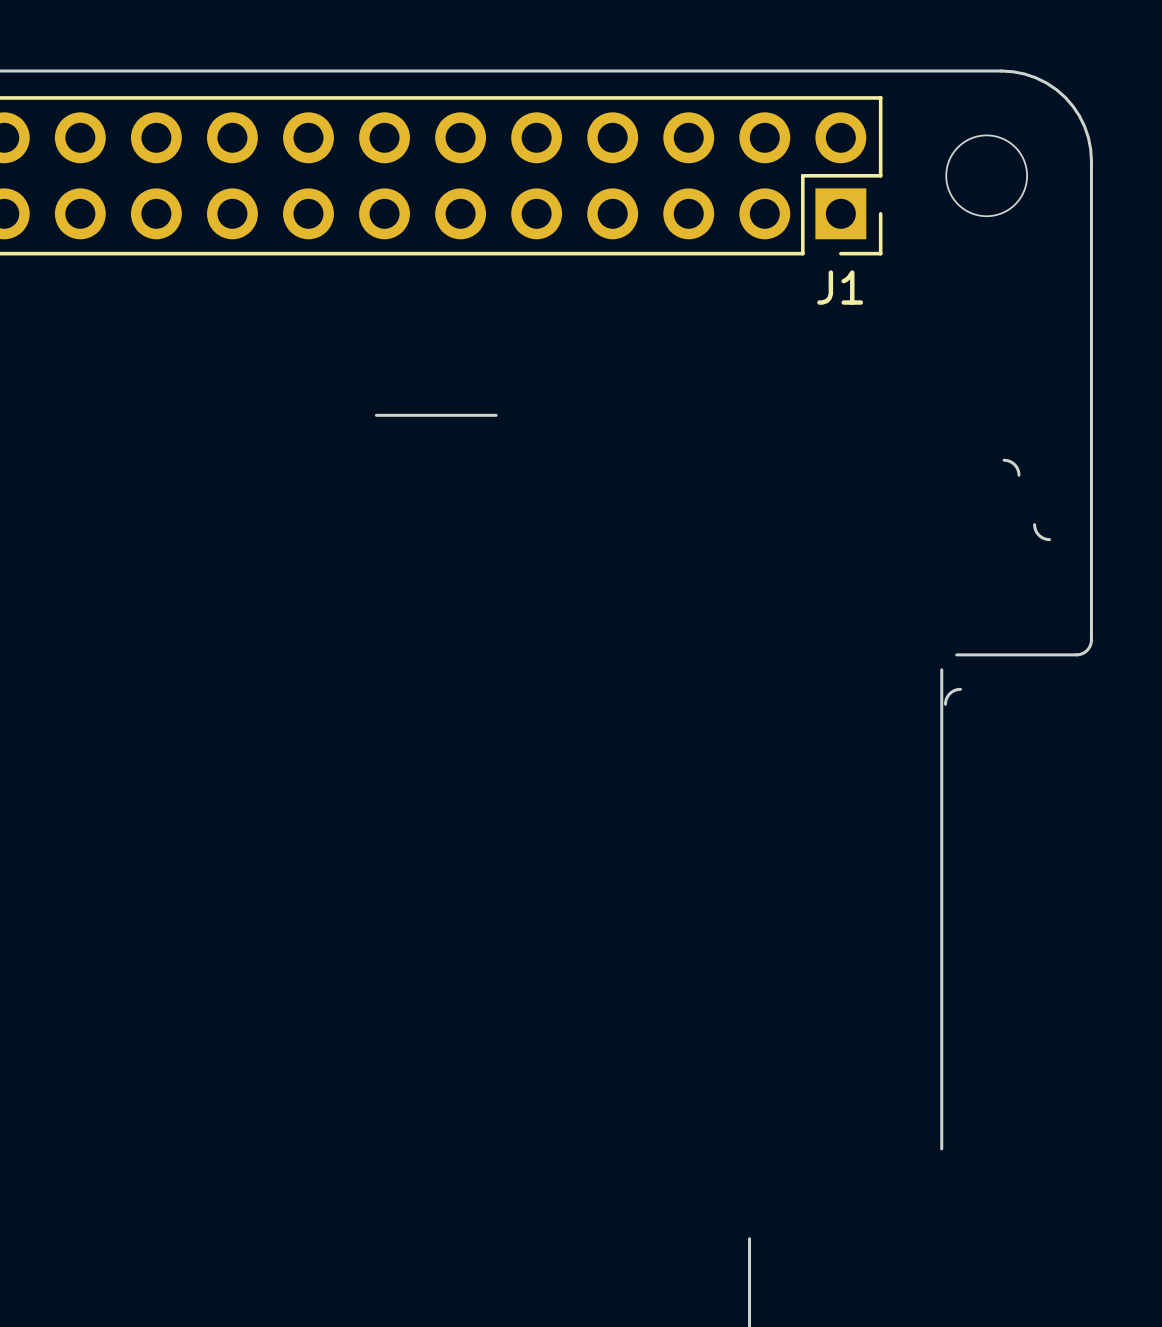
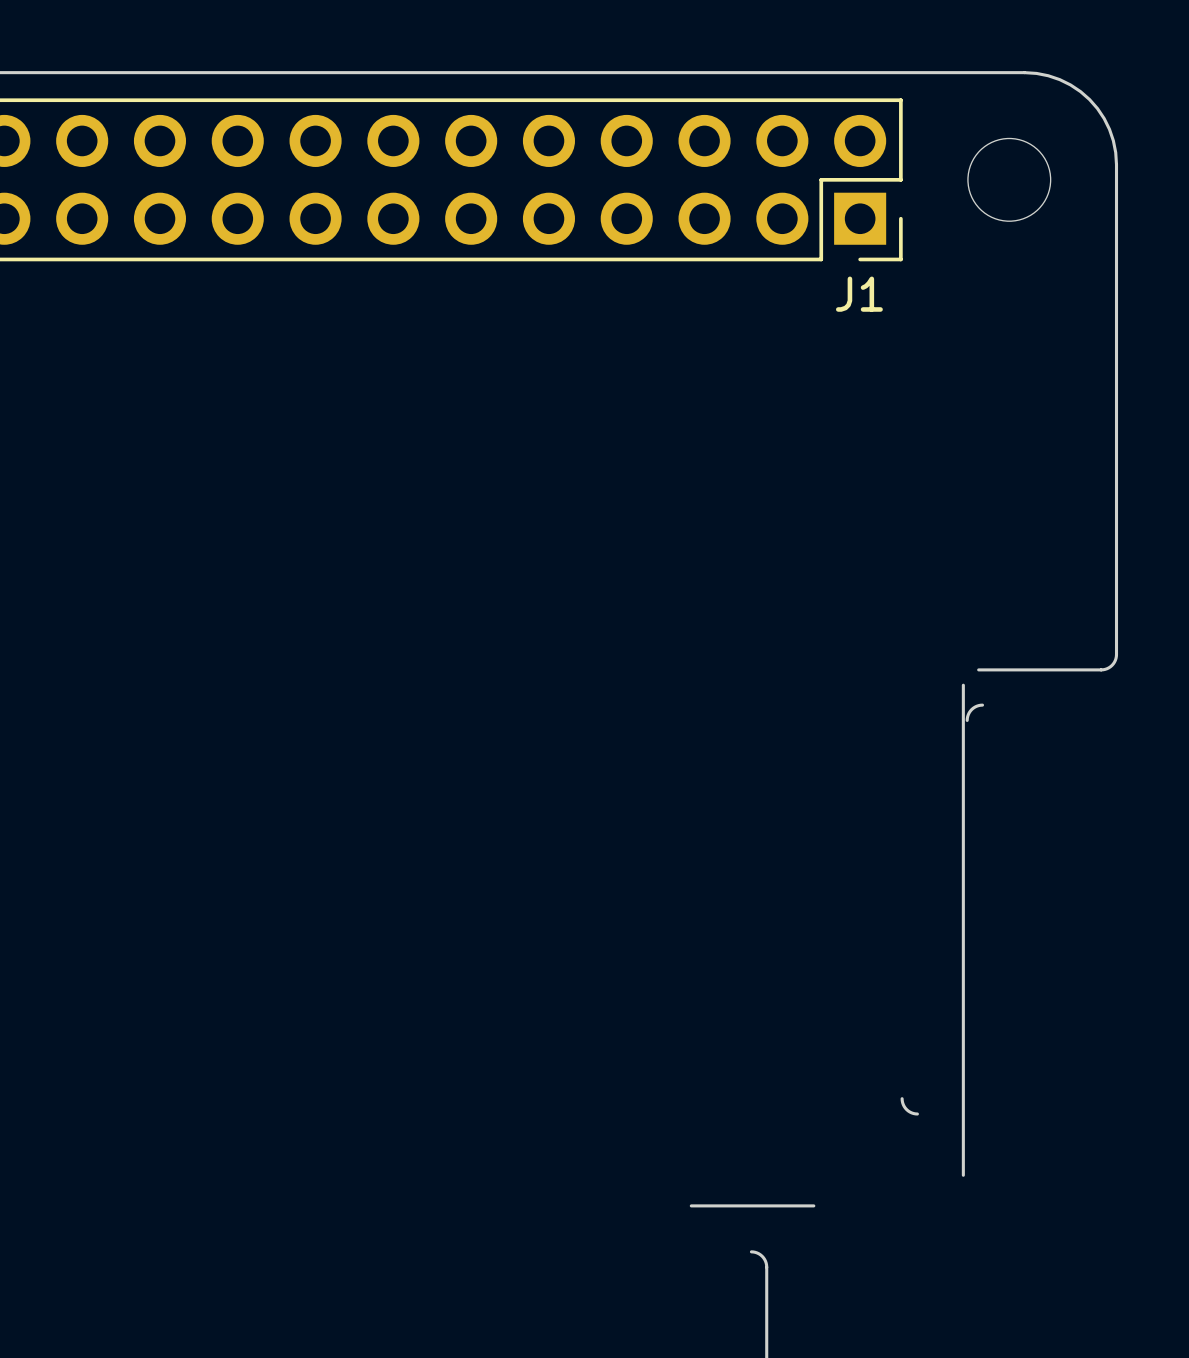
board edge: (496, 415) (376, 415) -> none
board edge: (1004, 460) (1014, 464) (1019, 475) -> none
board edge: (1034, 524) (1038, 535) (1049, 539) -> (902, 1098) (906, 1109) (917, 1114)
board edge: none -> (813, 1205) (691, 1205)
board edge: none -> (751, 1251) (762, 1256) (766, 1267)

